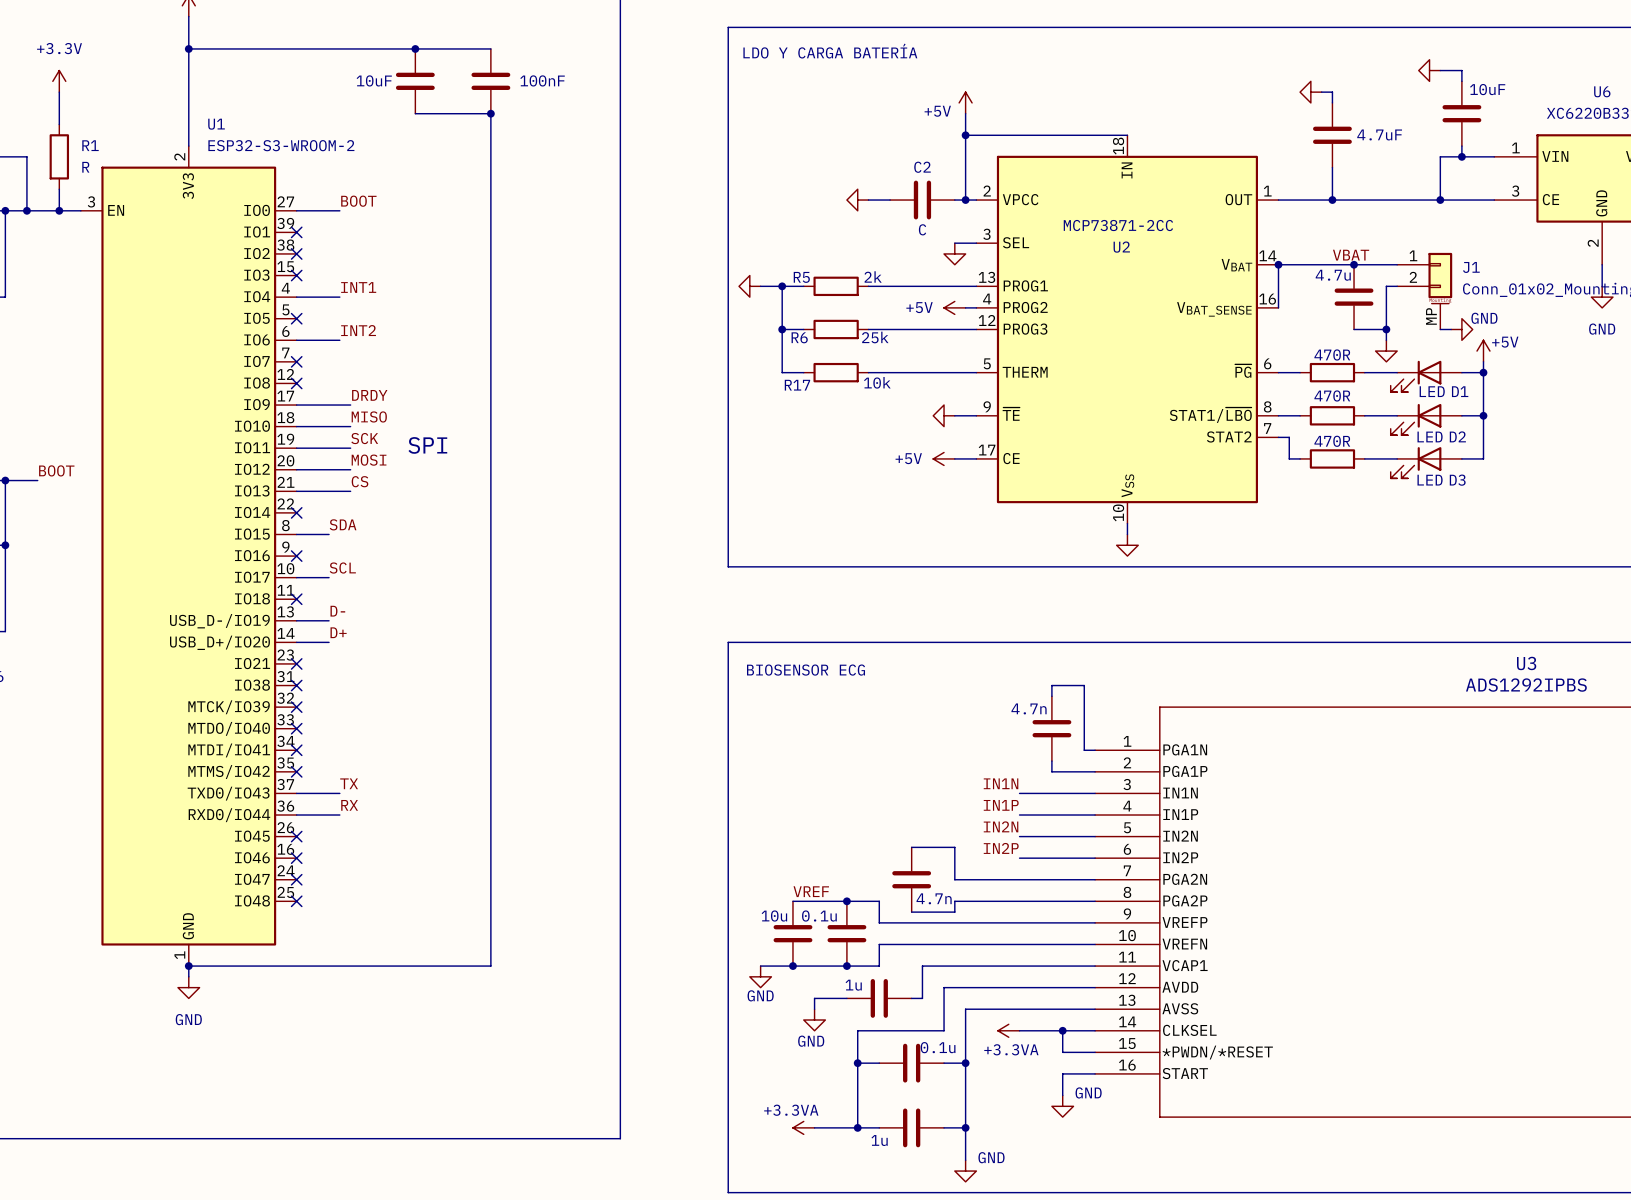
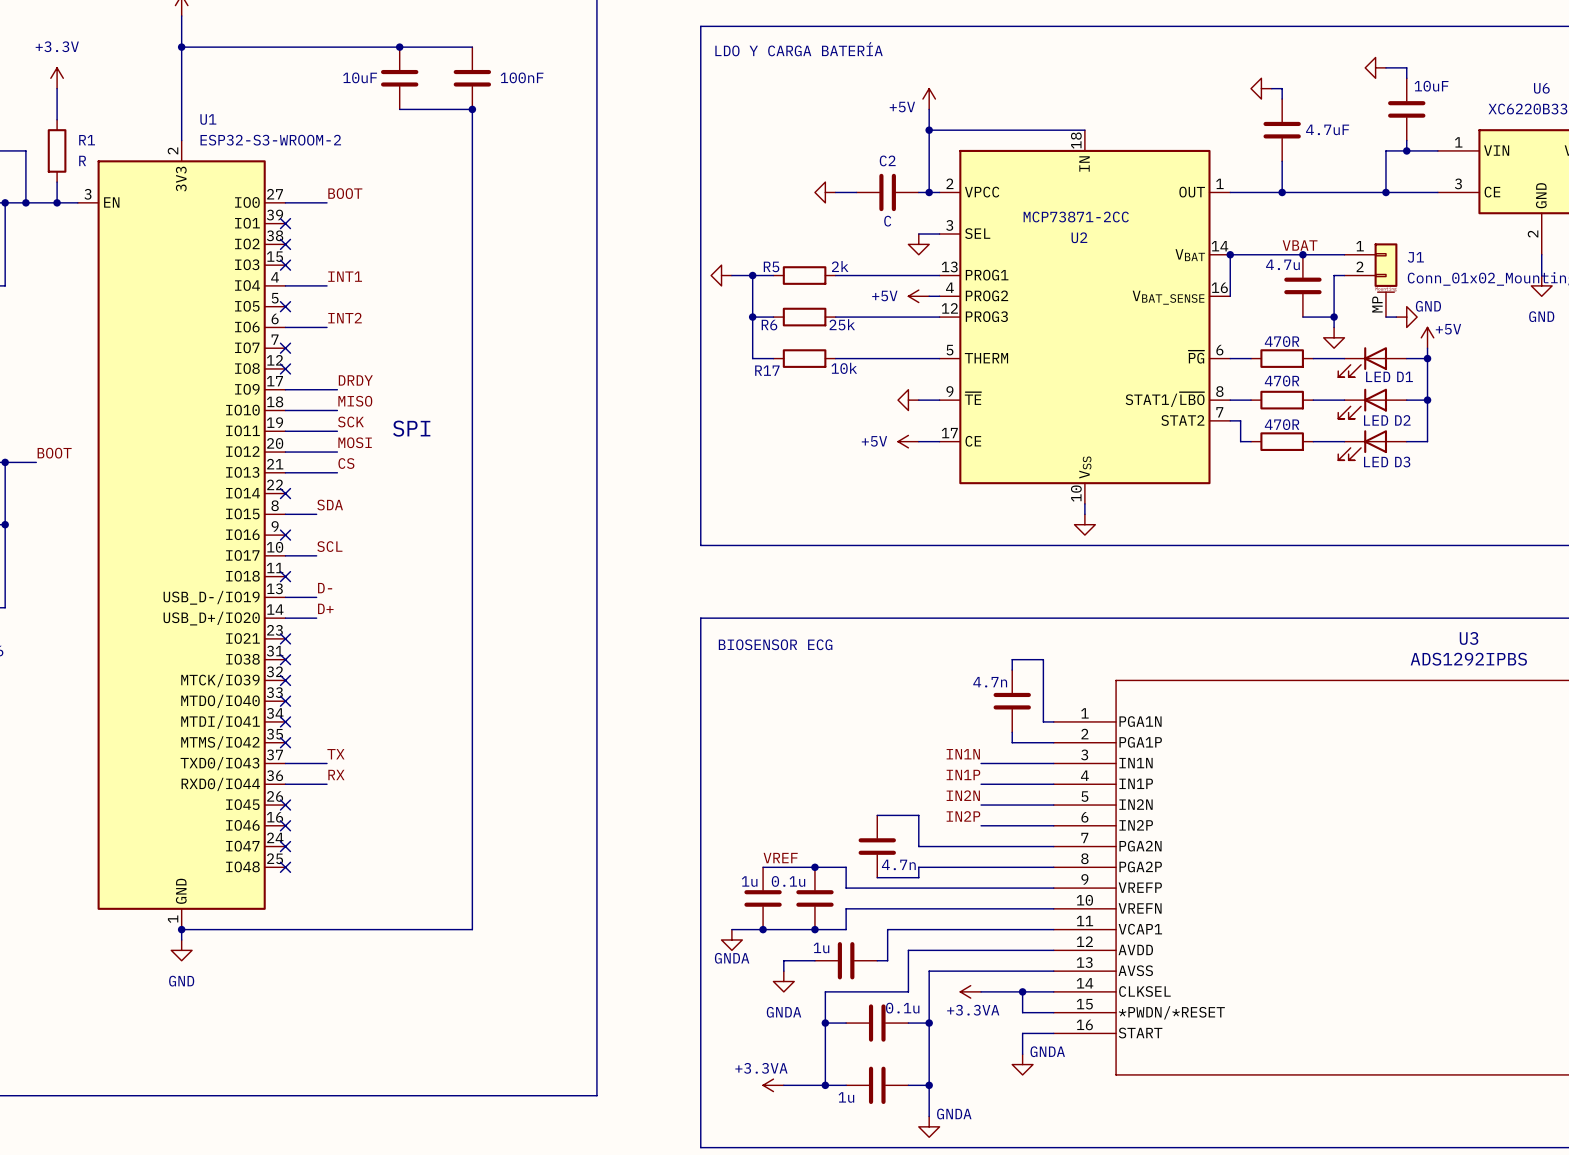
part value: 10u (774, 916) -> 1u (749, 881)
power symbol: GND (760, 976) -> GNDA (731, 939)
power symbol: GND (814, 1020) -> GNDA (783, 981)
power symbol: GND (1062, 1106) -> GNDA (1022, 1064)
power symbol: GND (965, 1171) -> GNDA (929, 1126)

